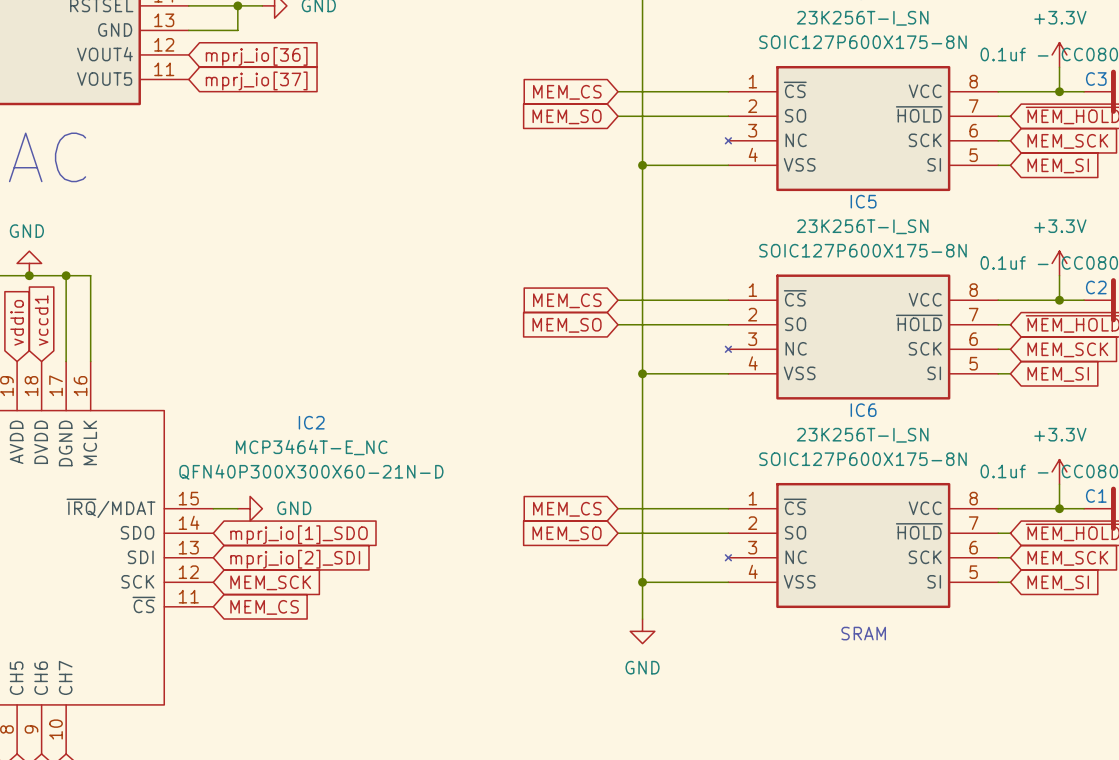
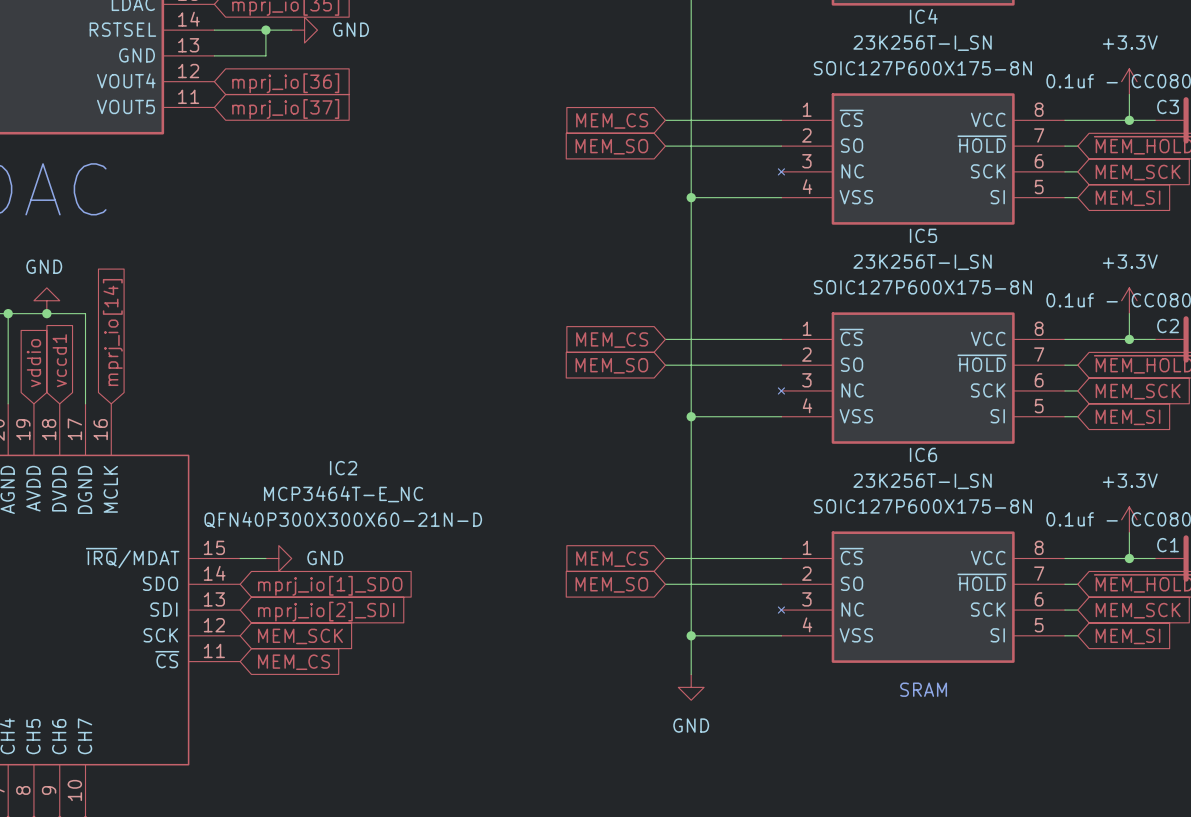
wire: (66, 275) (90, 275) (90, 361) -> none
junction: (66, 275) -> none
global label: none -> mprj_io[14] (112, 332)

